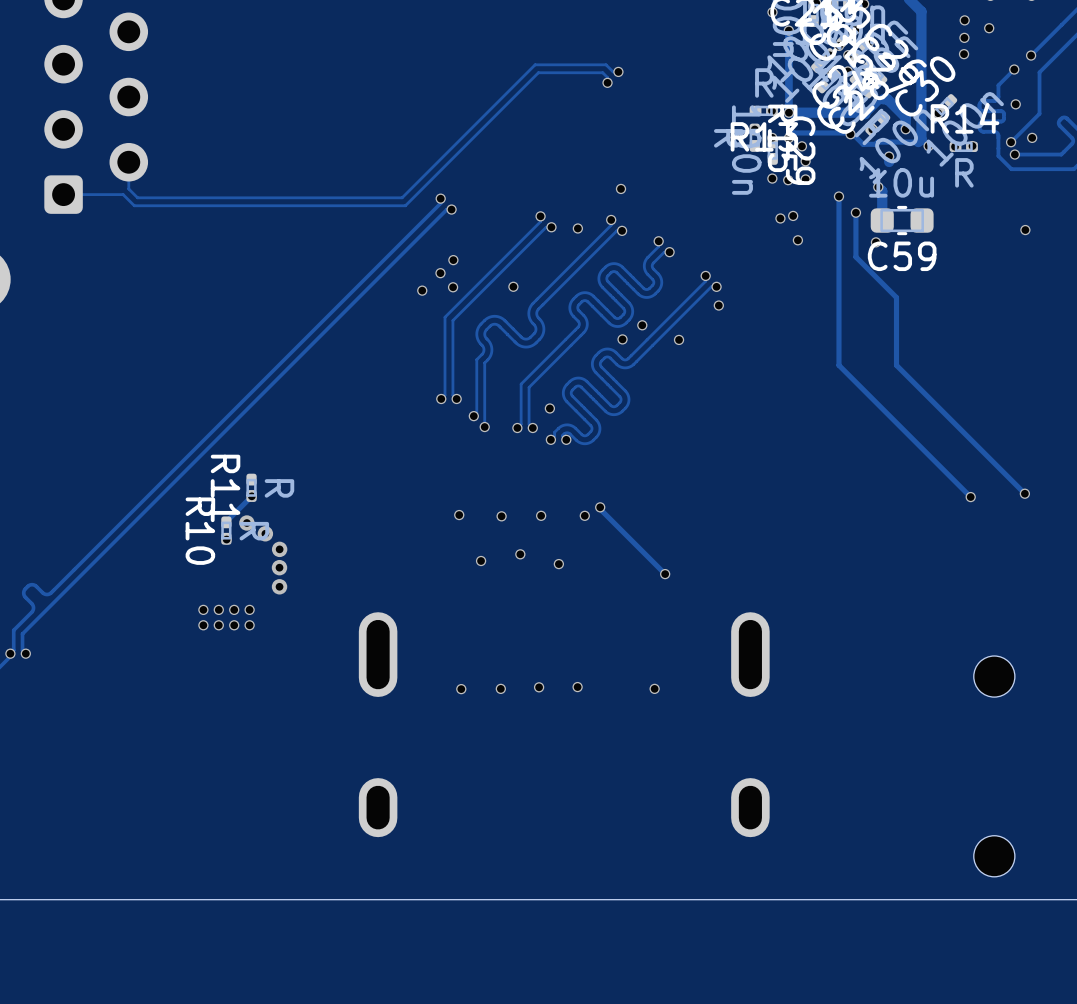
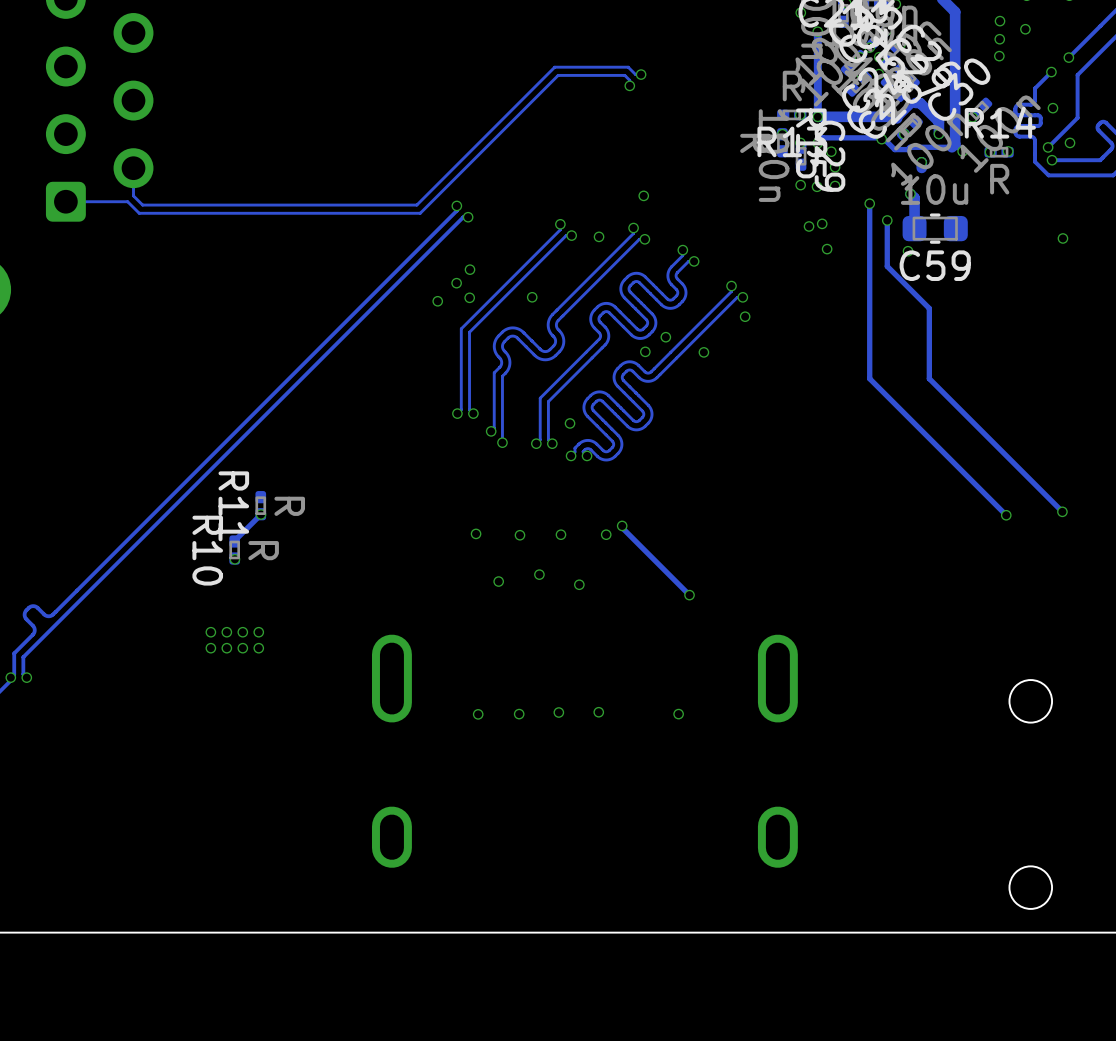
via: (246, 523) -> none
via: (265, 533) -> none
via: (279, 549) -> none
via: (279, 567) -> none
via: (279, 586) -> none

